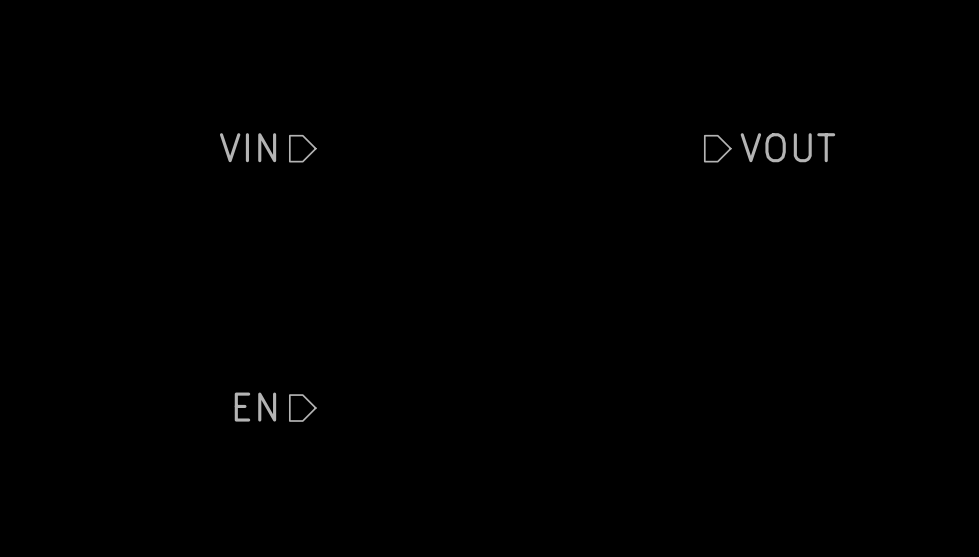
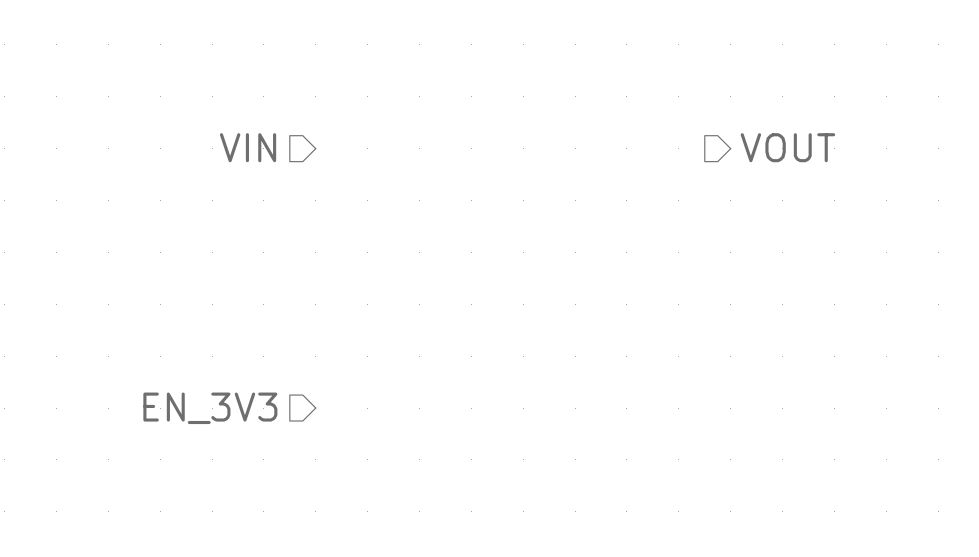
hierarchical label: EN (255, 407) -> EN_3V3 (210, 408)

